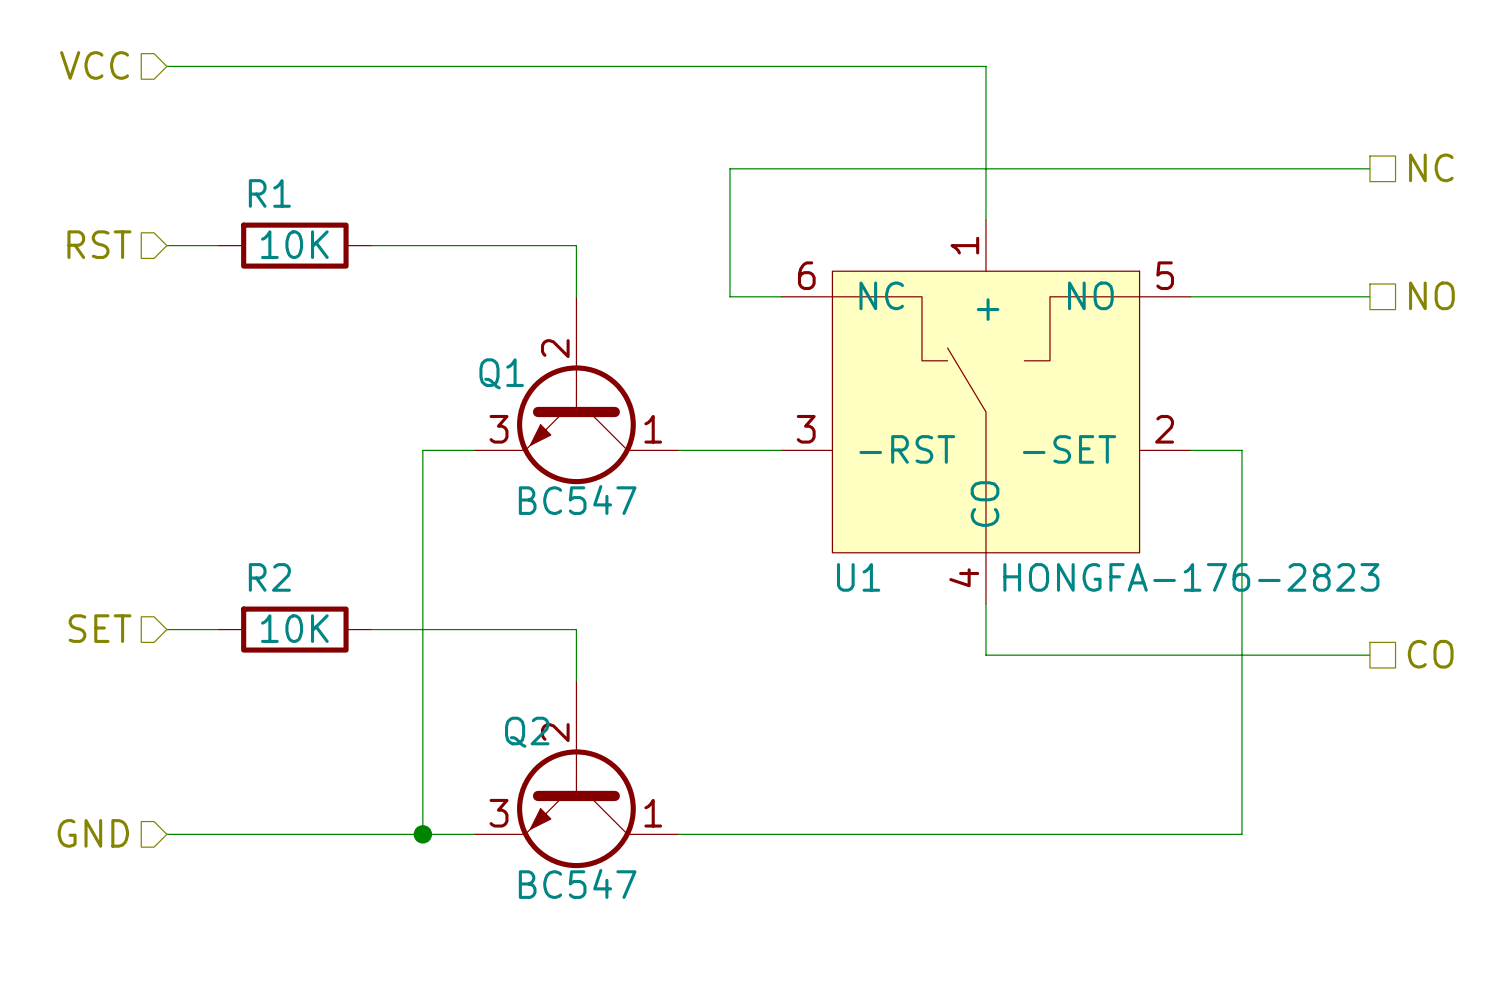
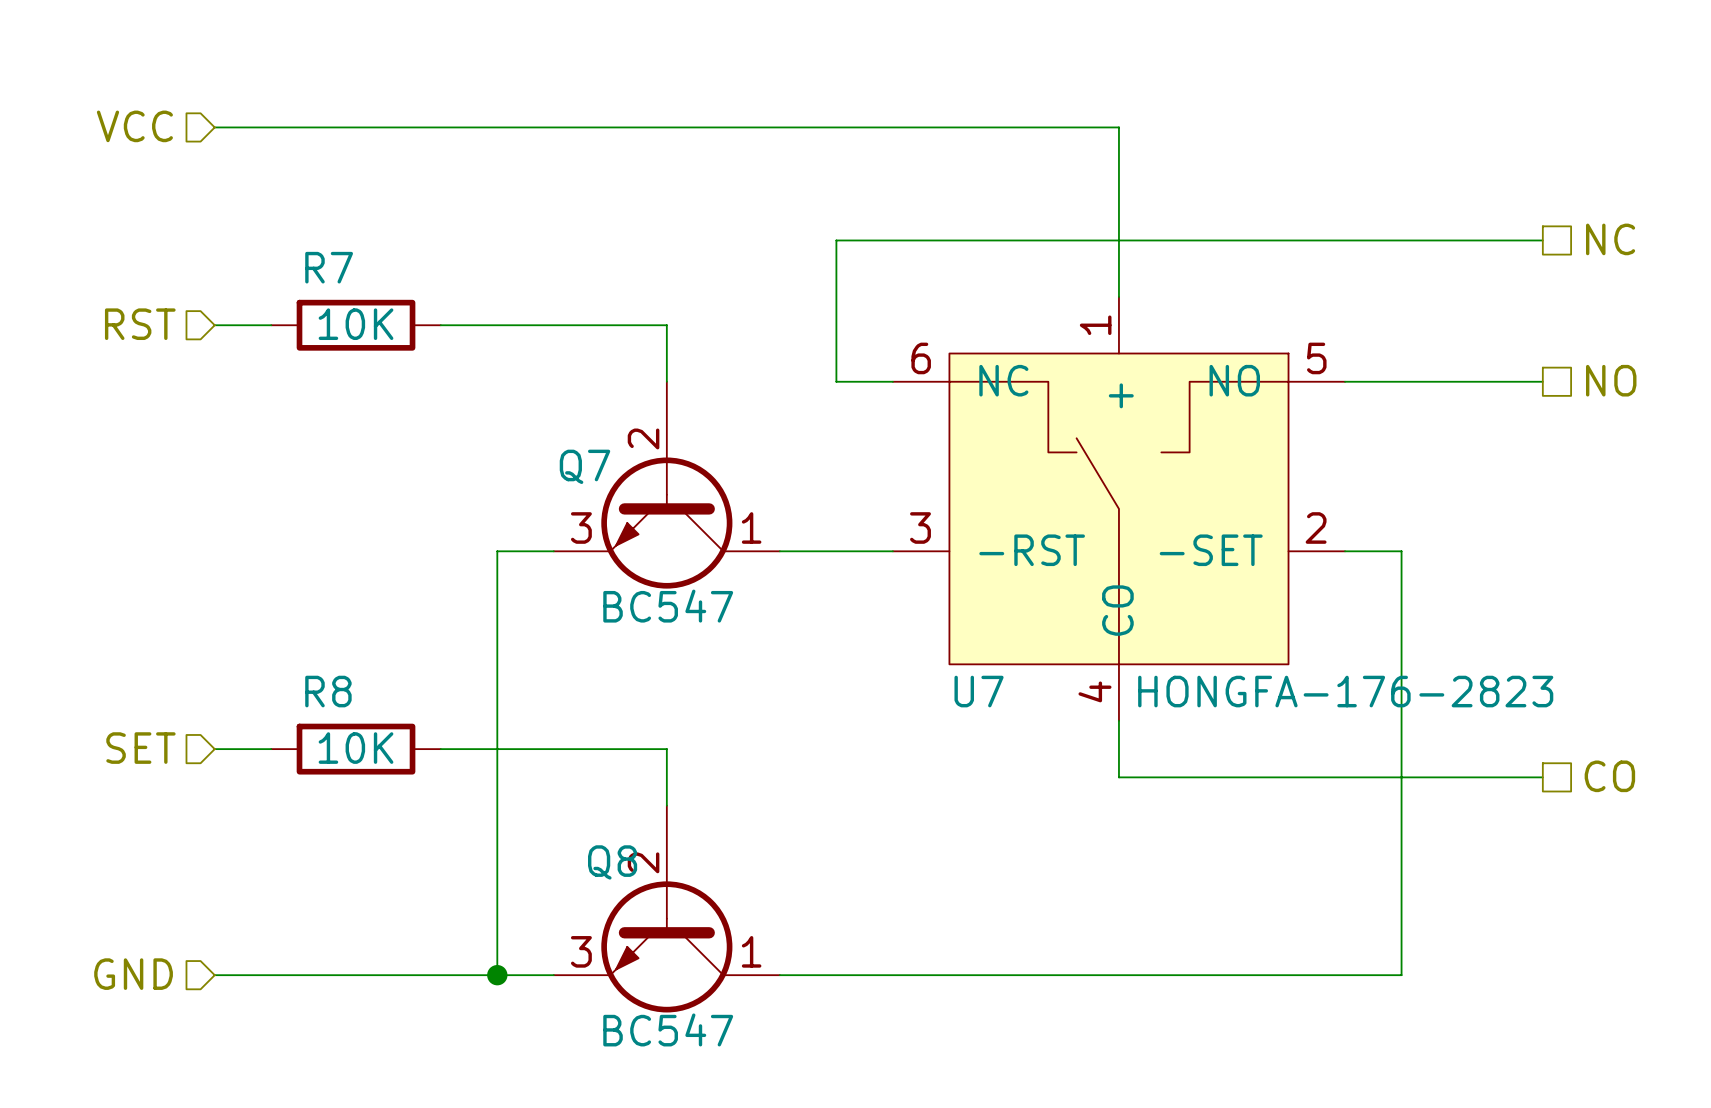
R1 name: R1 (269, 193) -> R7 (329, 267)
Q1 name: Q1 (501, 373) -> Q7 (584, 466)
R2 name: R2 (269, 577) -> R8 (328, 691)
U1 name: U1 (858, 577) -> U7 (979, 691)
Q2 name: Q2 (527, 732) -> Q8 (612, 862)

